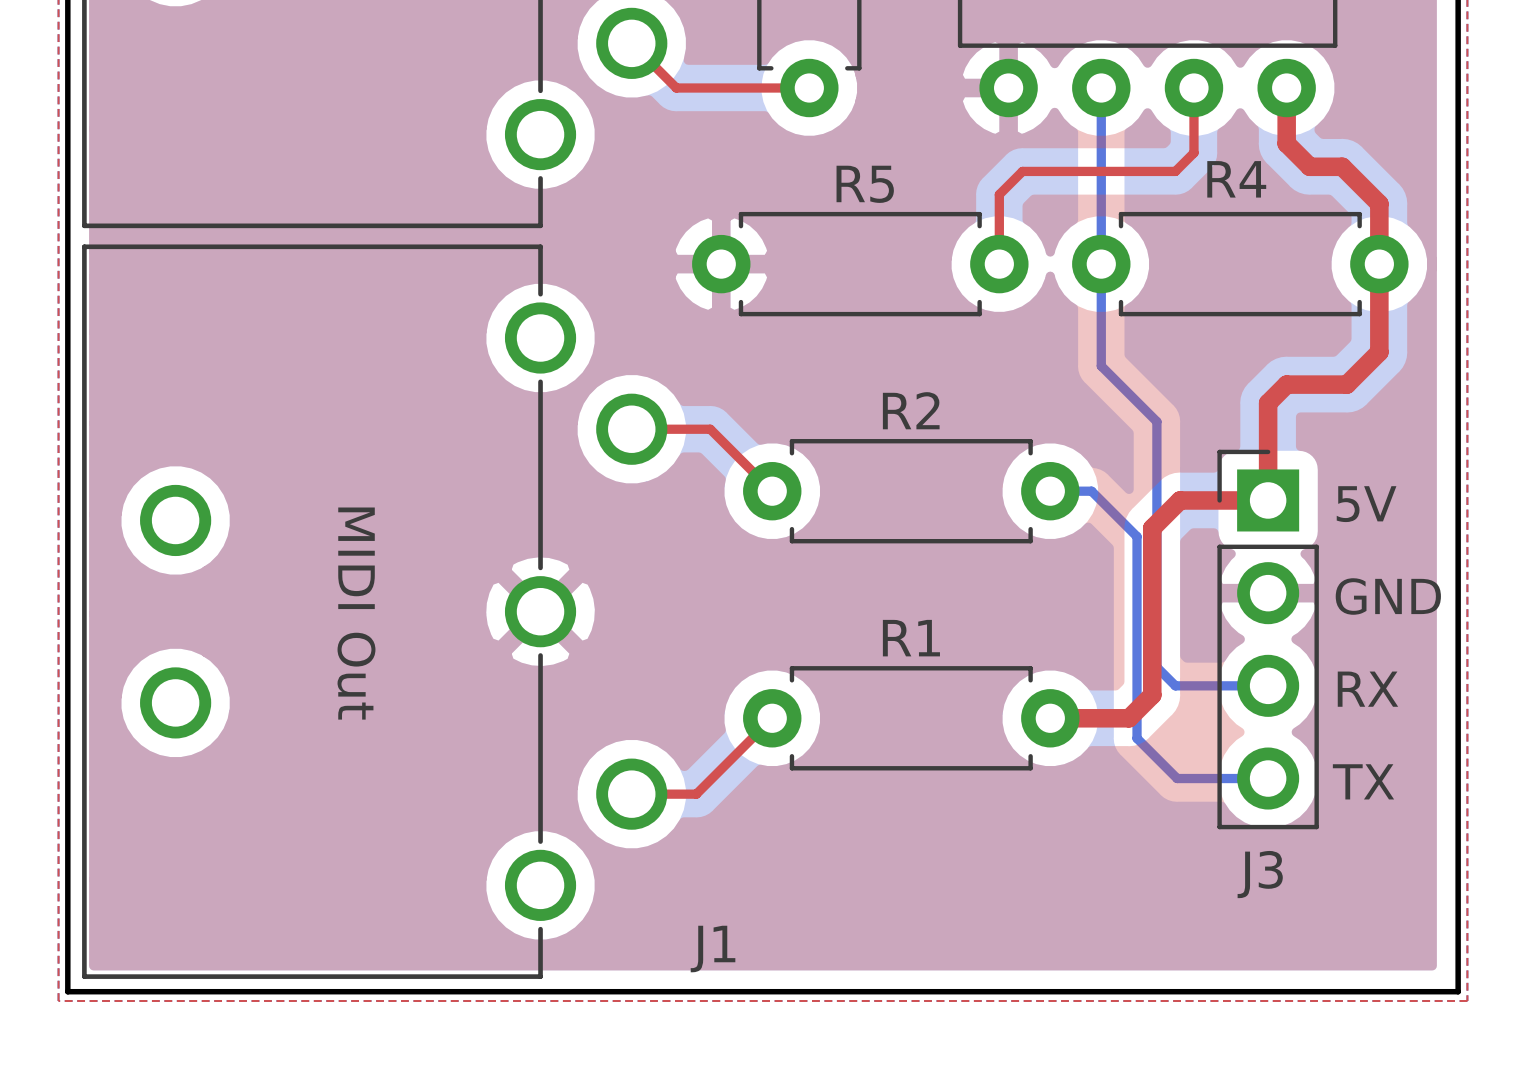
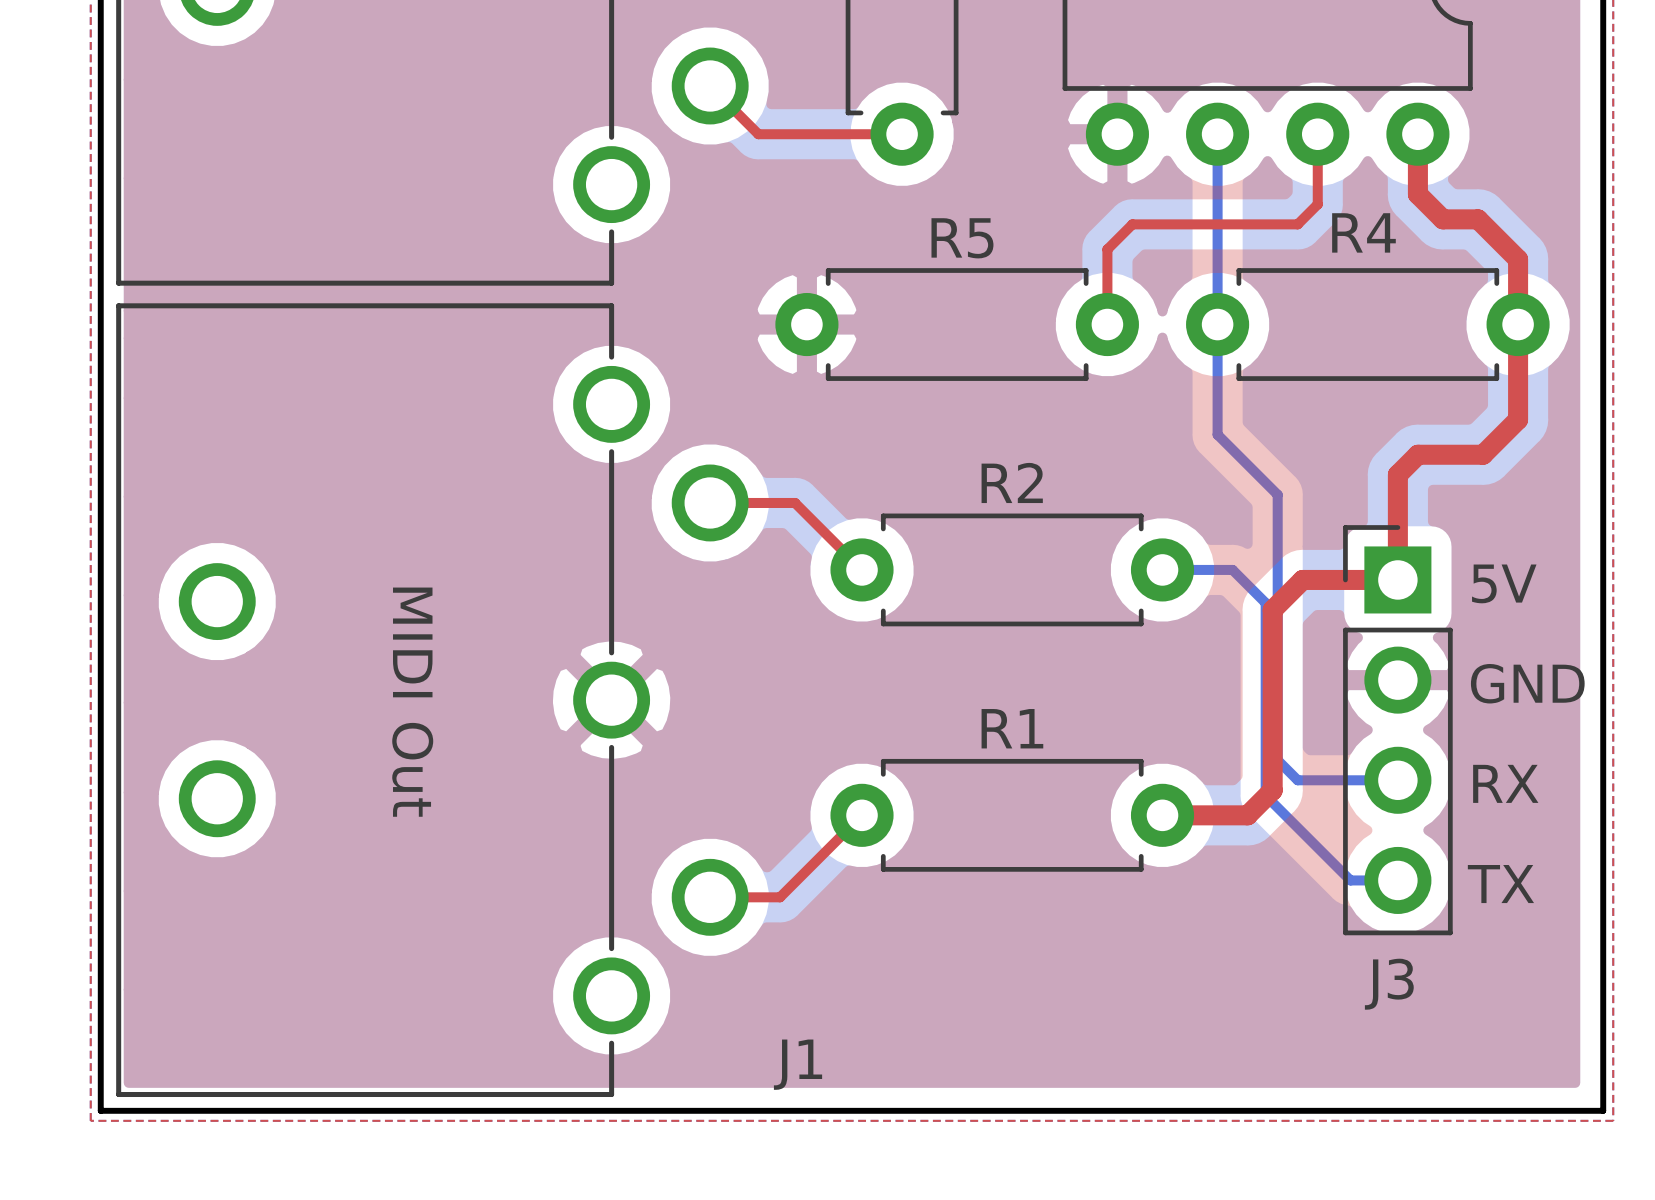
bottom track: (1091, 491) (1137, 536) (1137, 738) (1177, 778) (1224, 778) -> (1207, 569) (1232, 569) (1265, 602) (1265, 795) (1350, 880)

